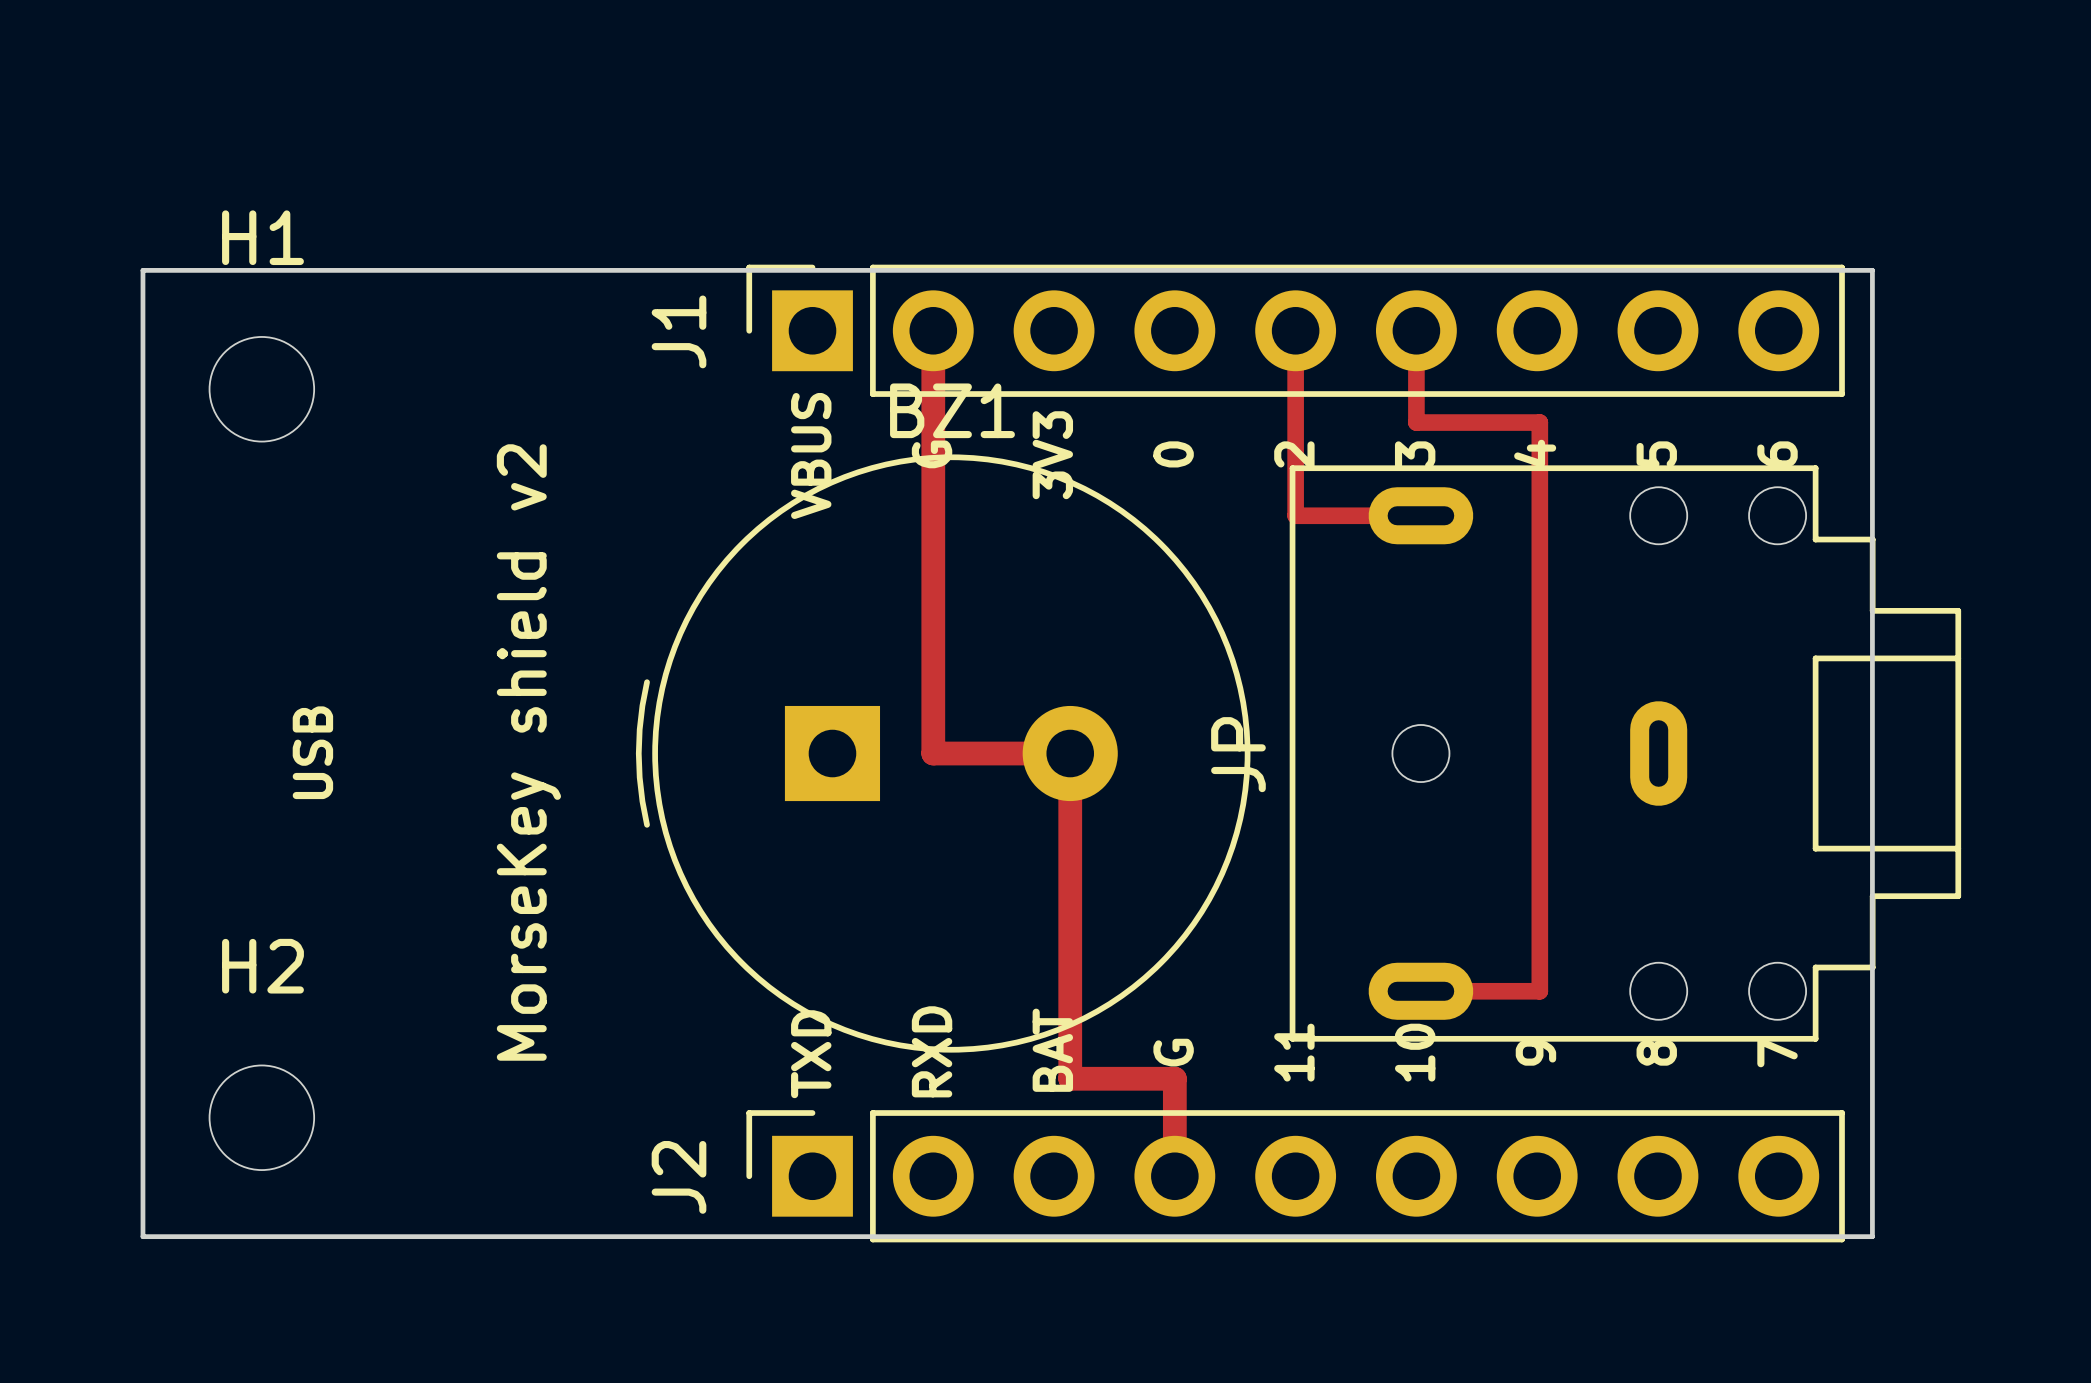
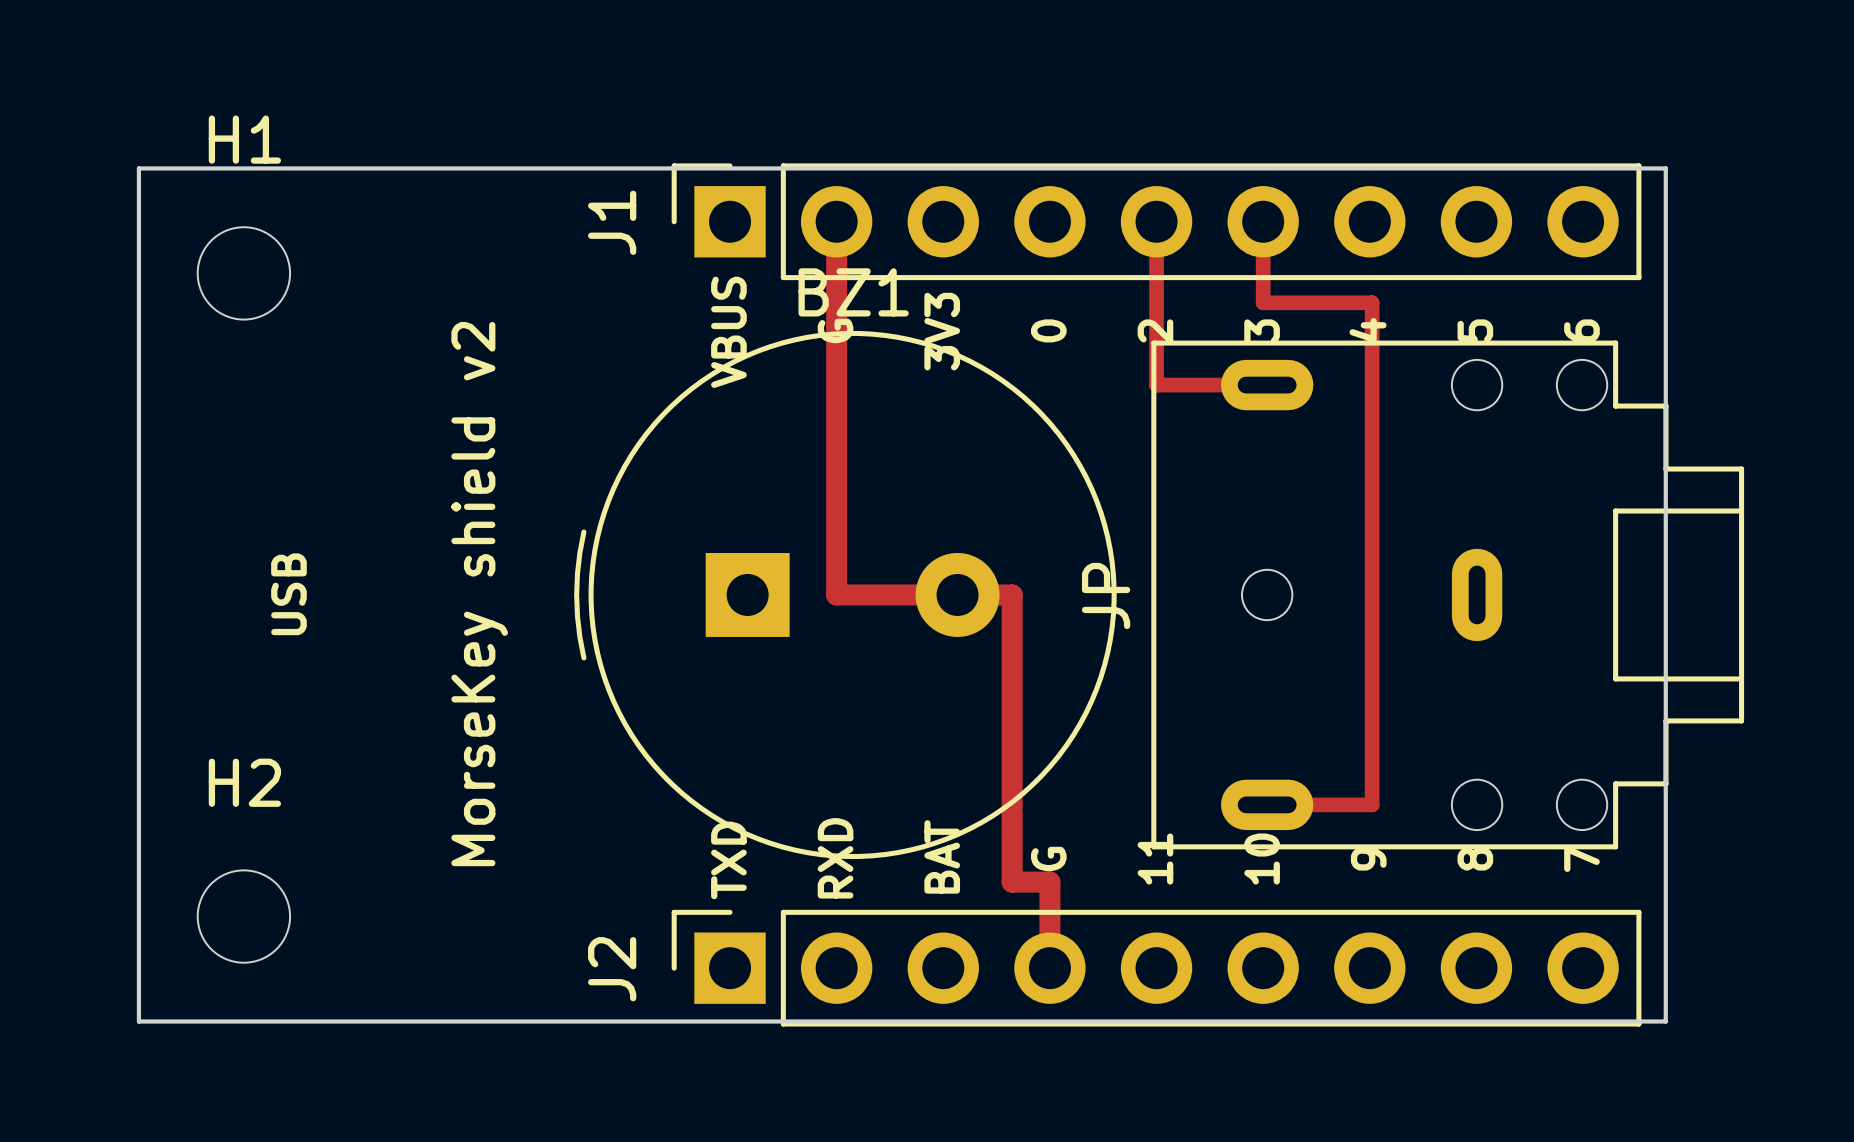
track: (1070, 753) (1070, 1078) (1132, 1078) -> (957, 594) (1012, 594) (1012, 882)

